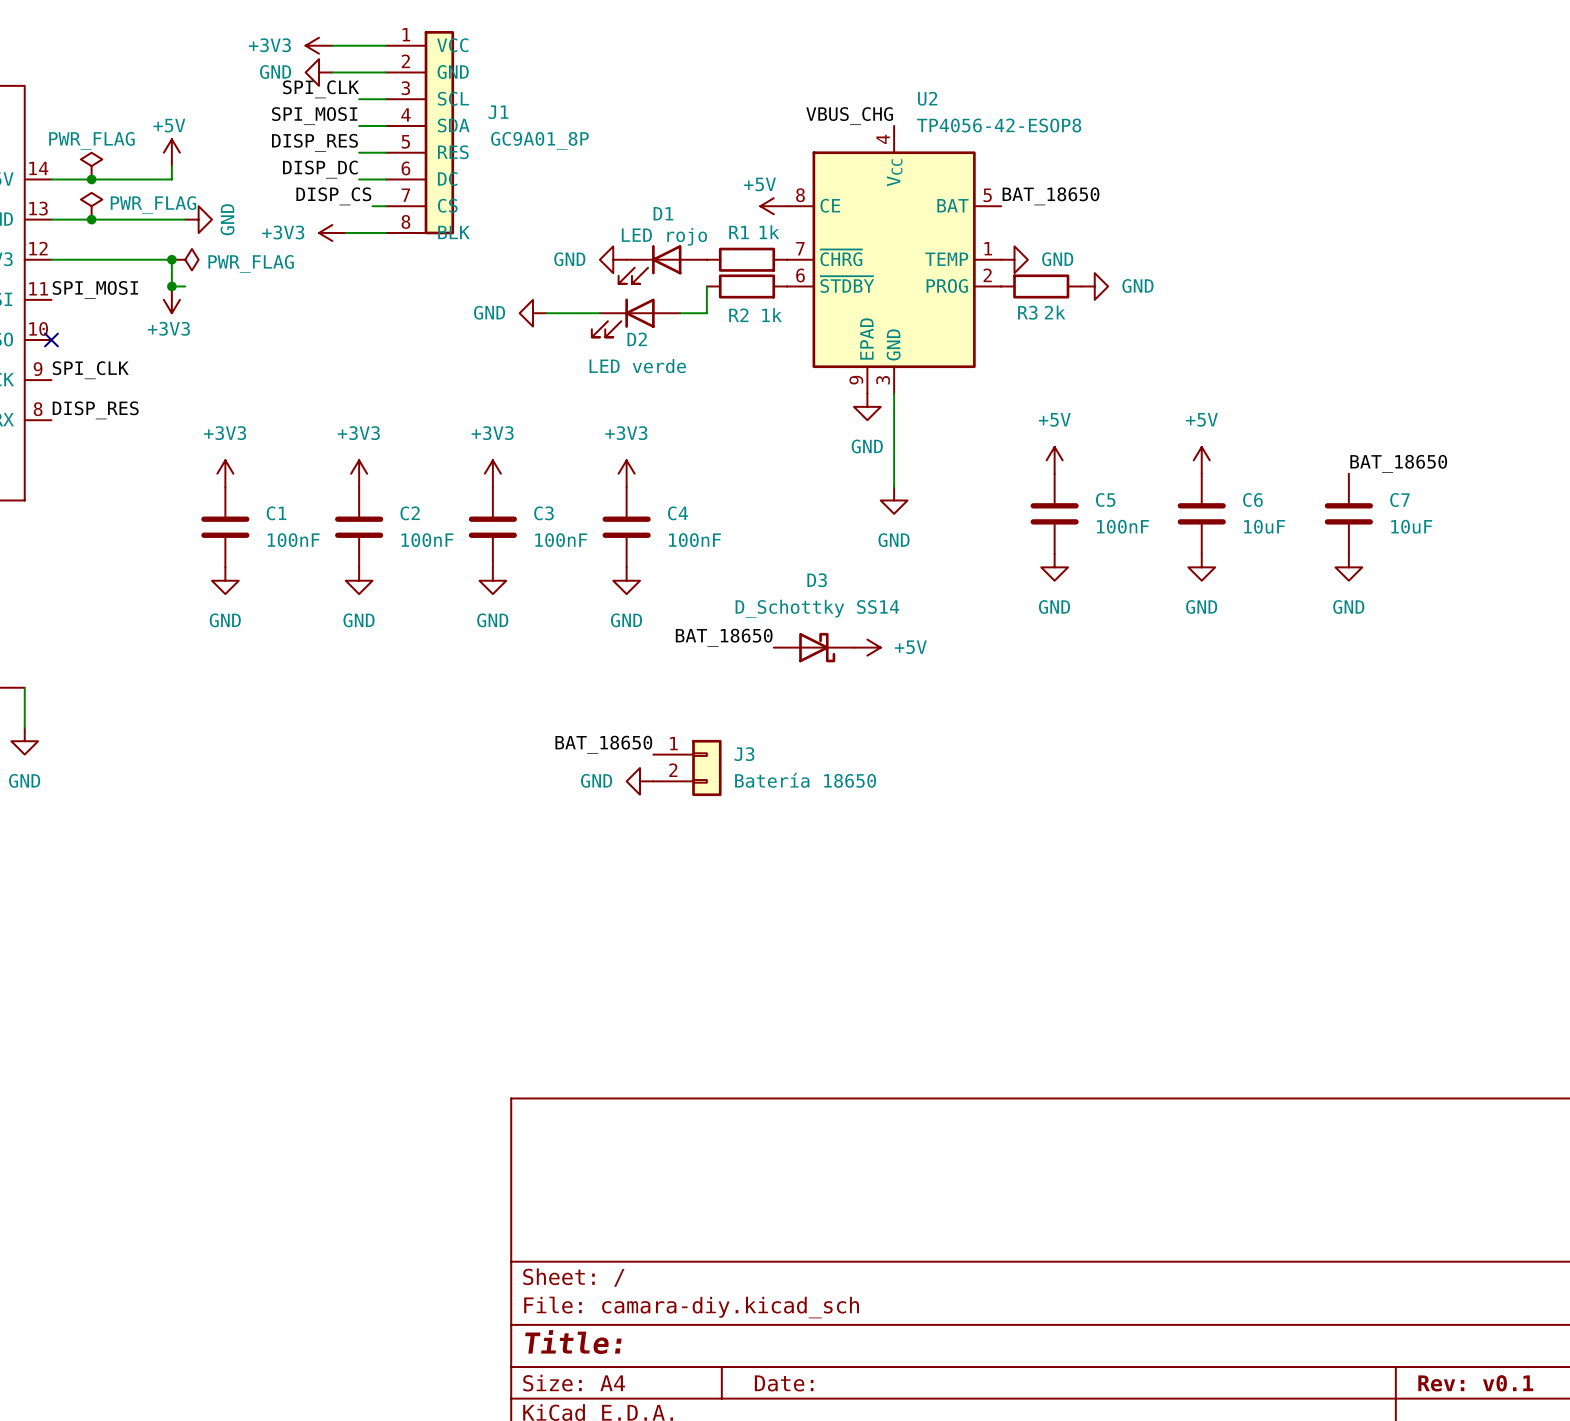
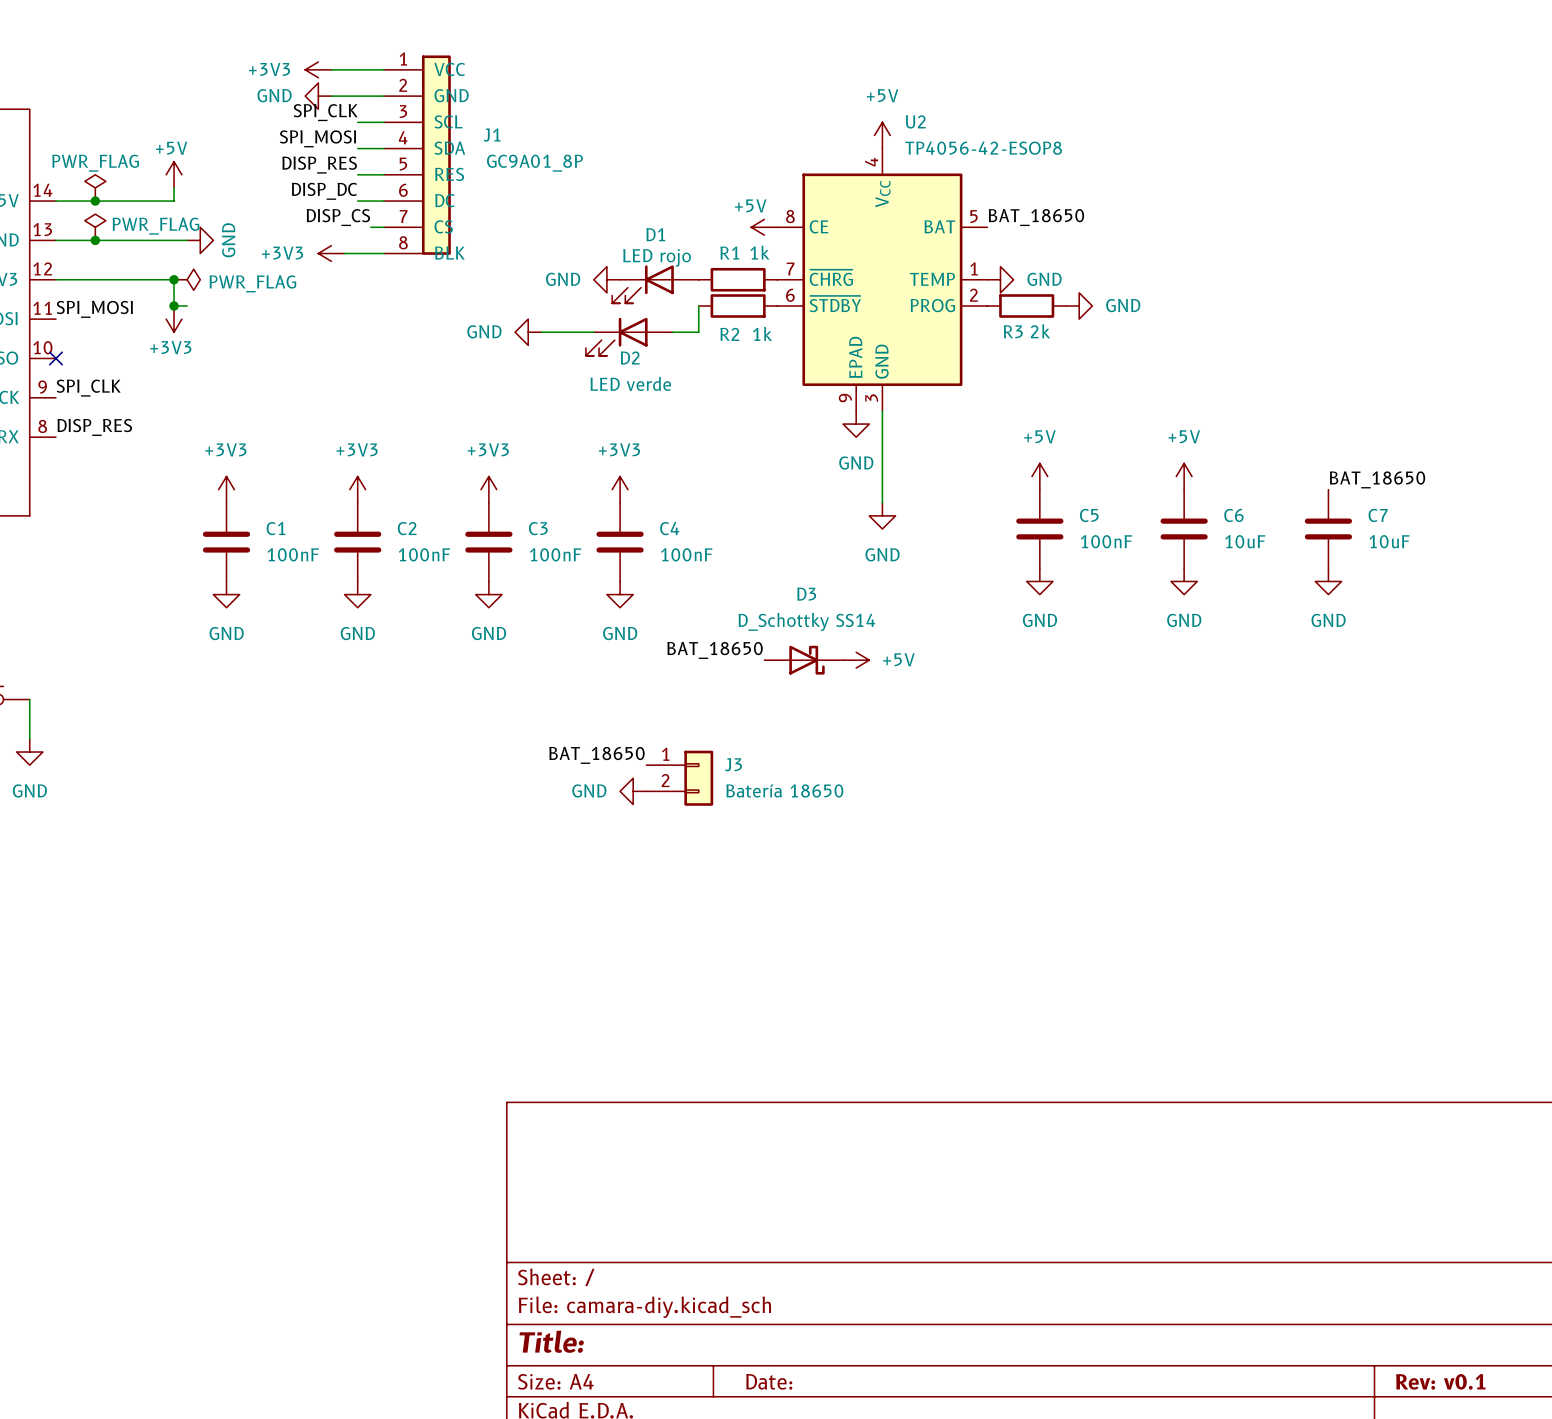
power symbol: none -> +5V (882, 135)
label: VBUS_CHG (849, 116) -> none

